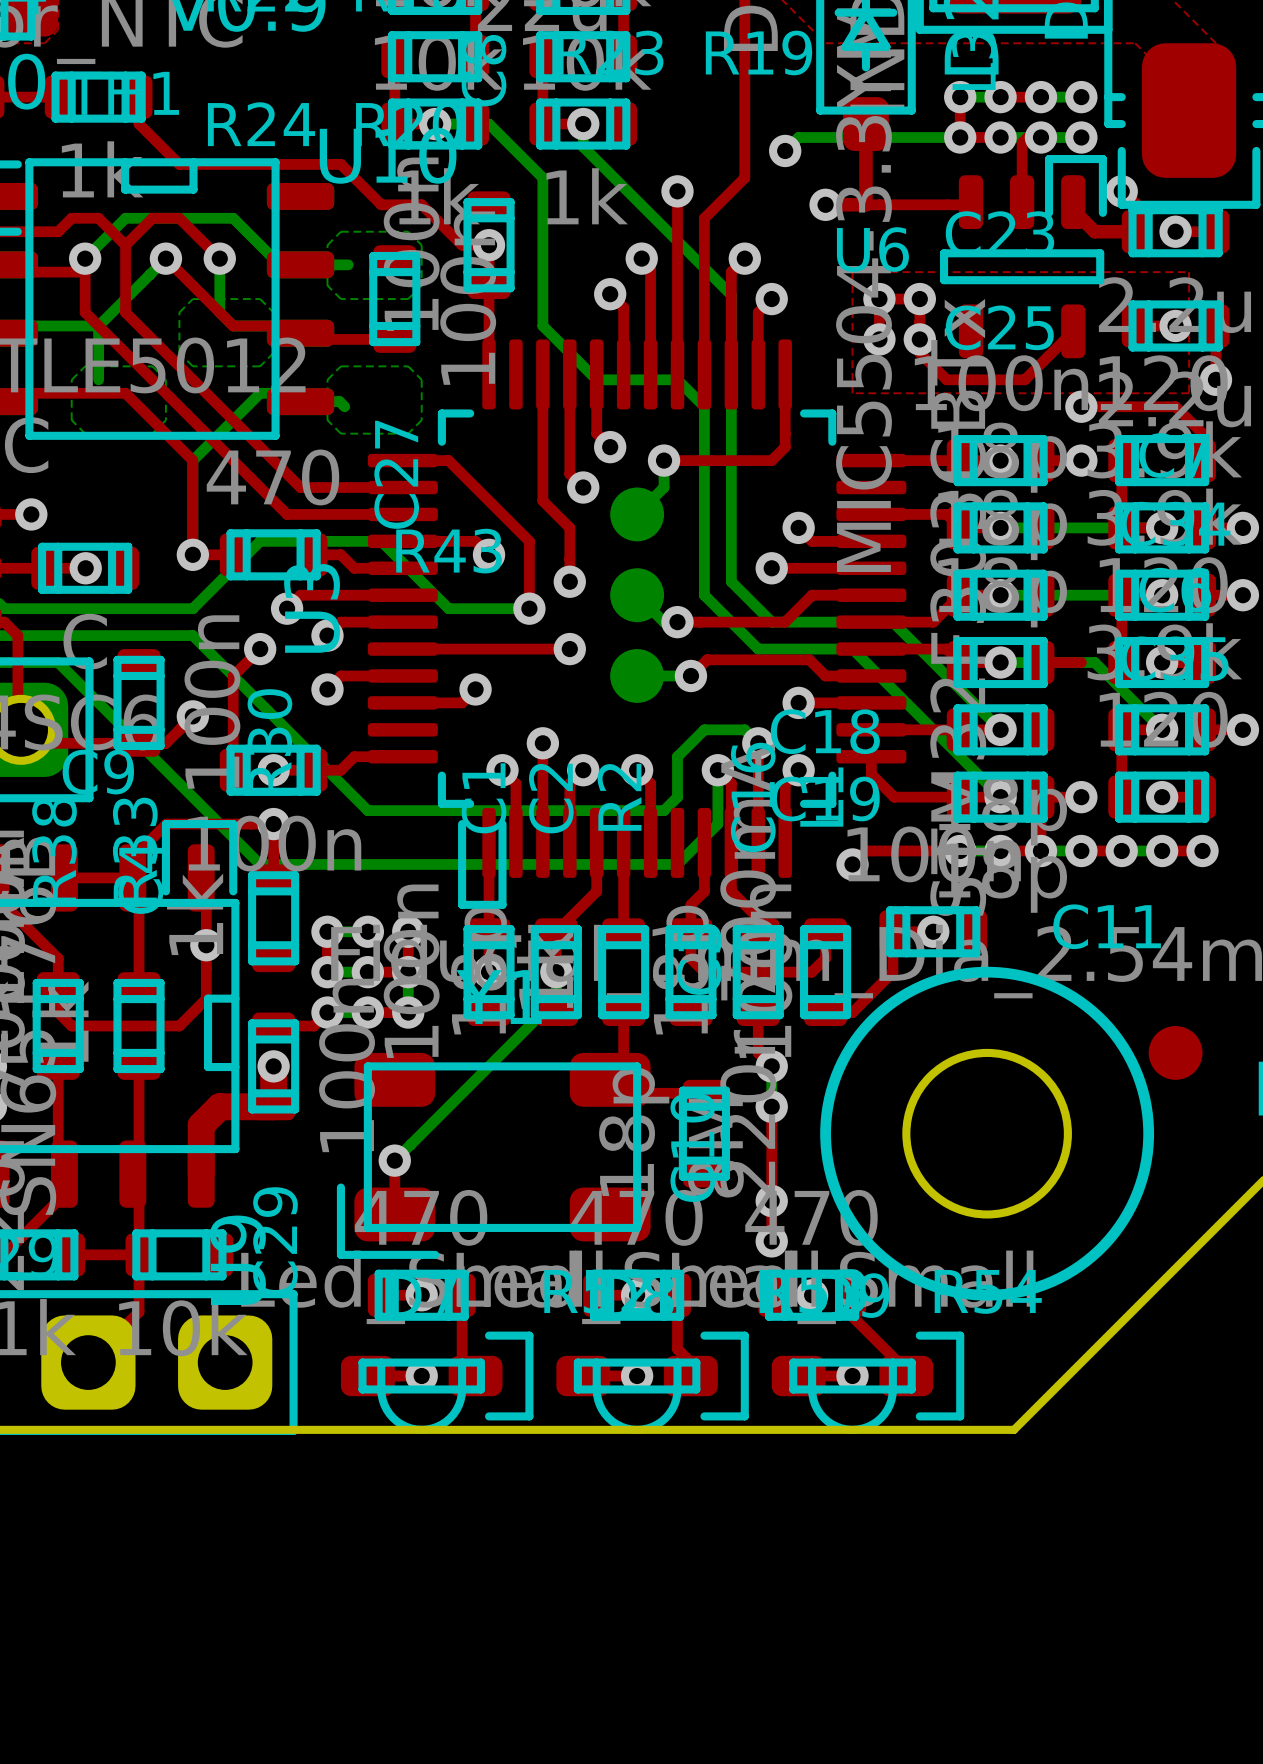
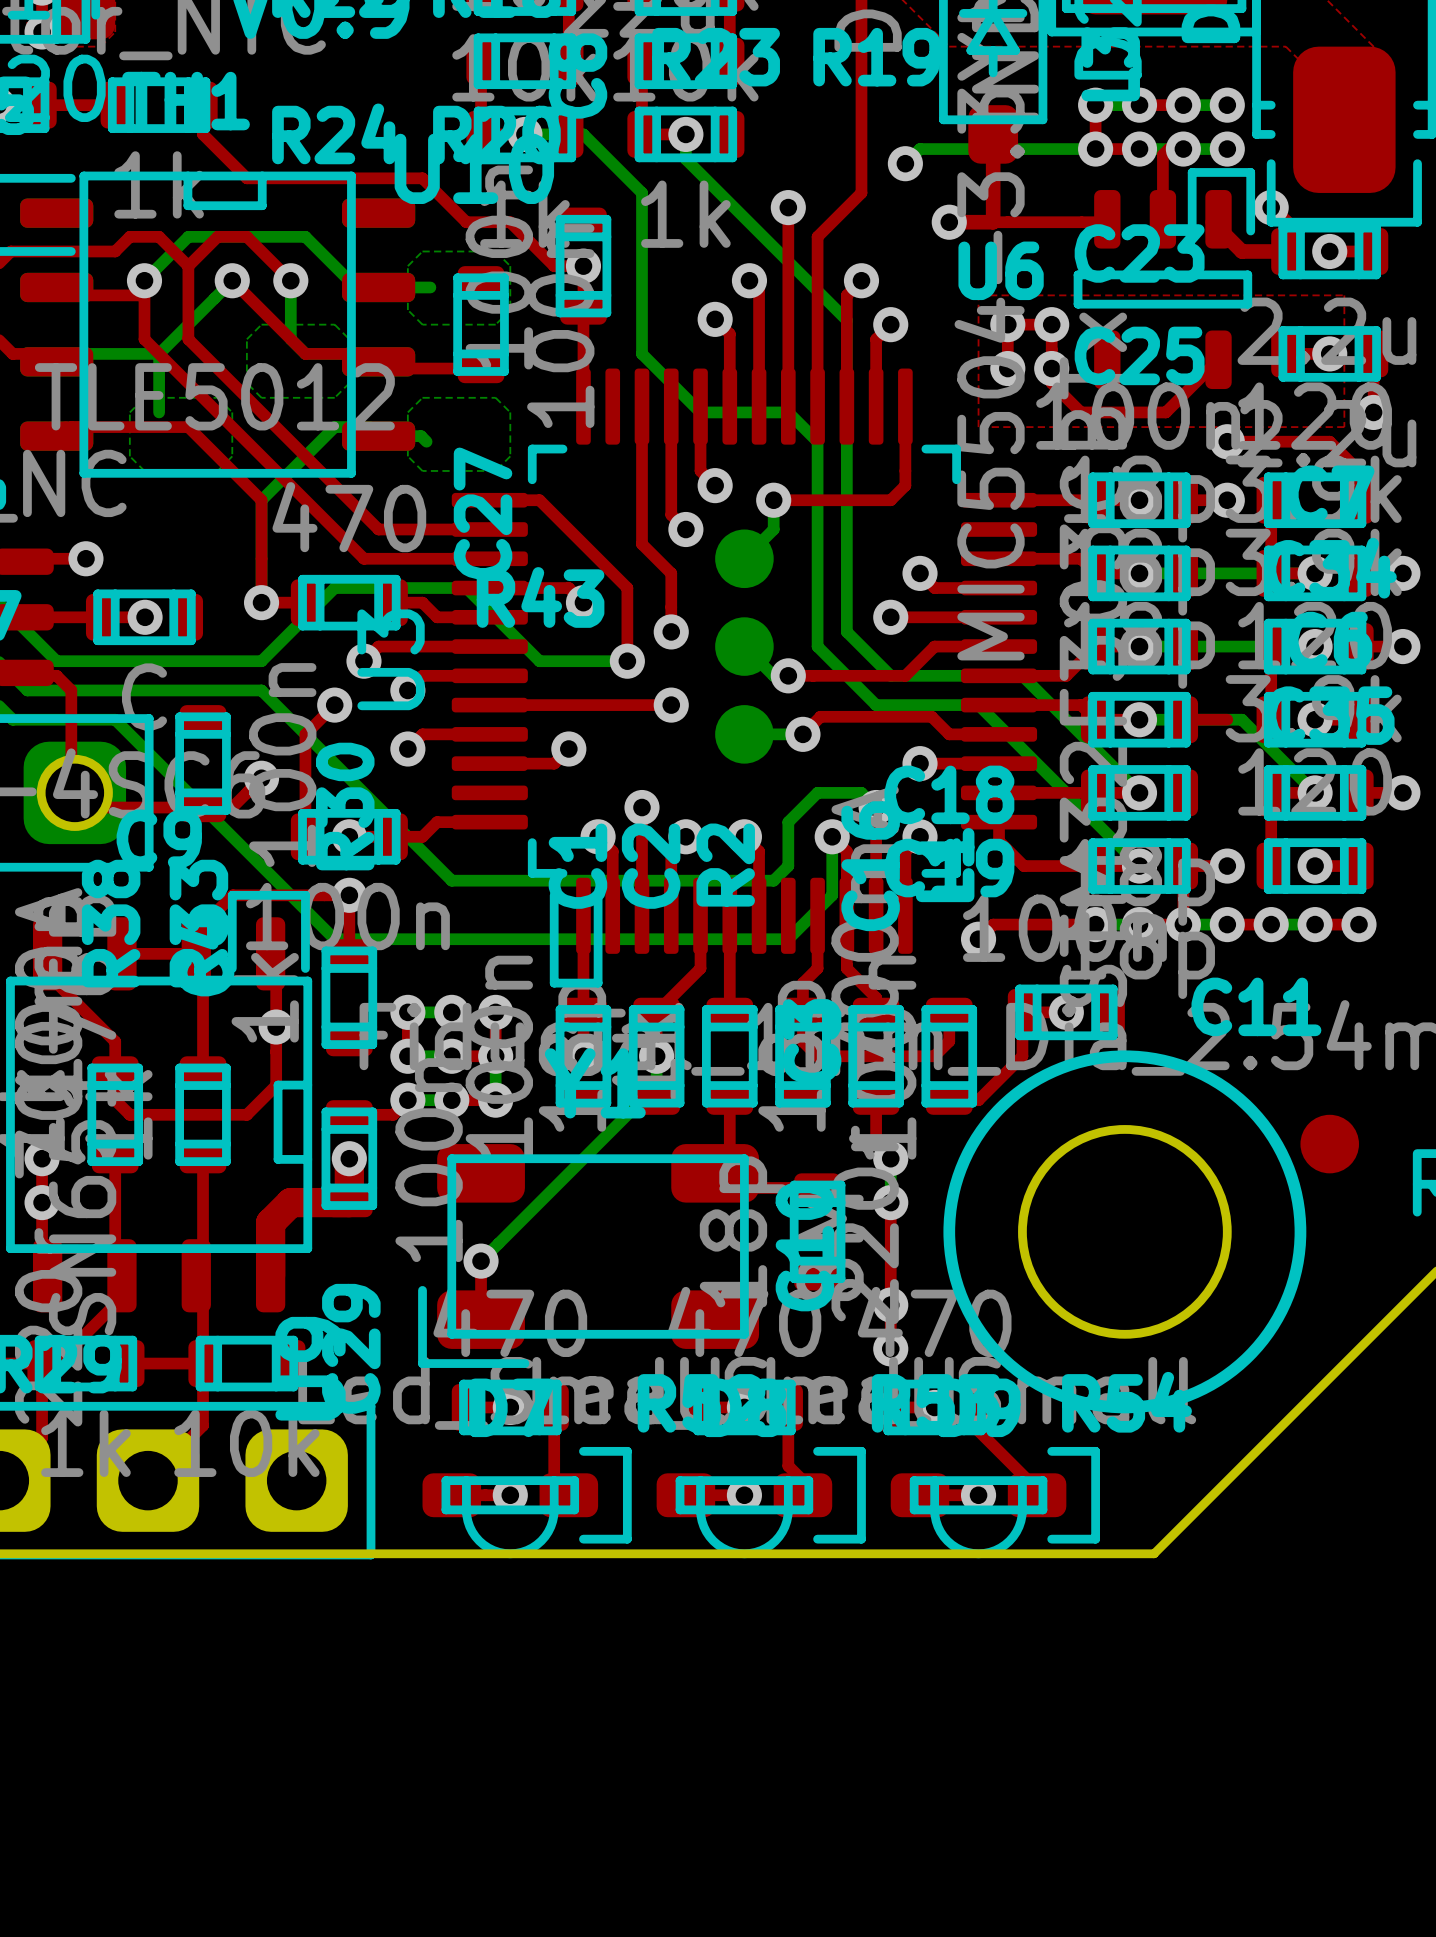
round board edge size: [902, 1048, 1072, 1219] -> [1018, 1125, 1232, 1339]

